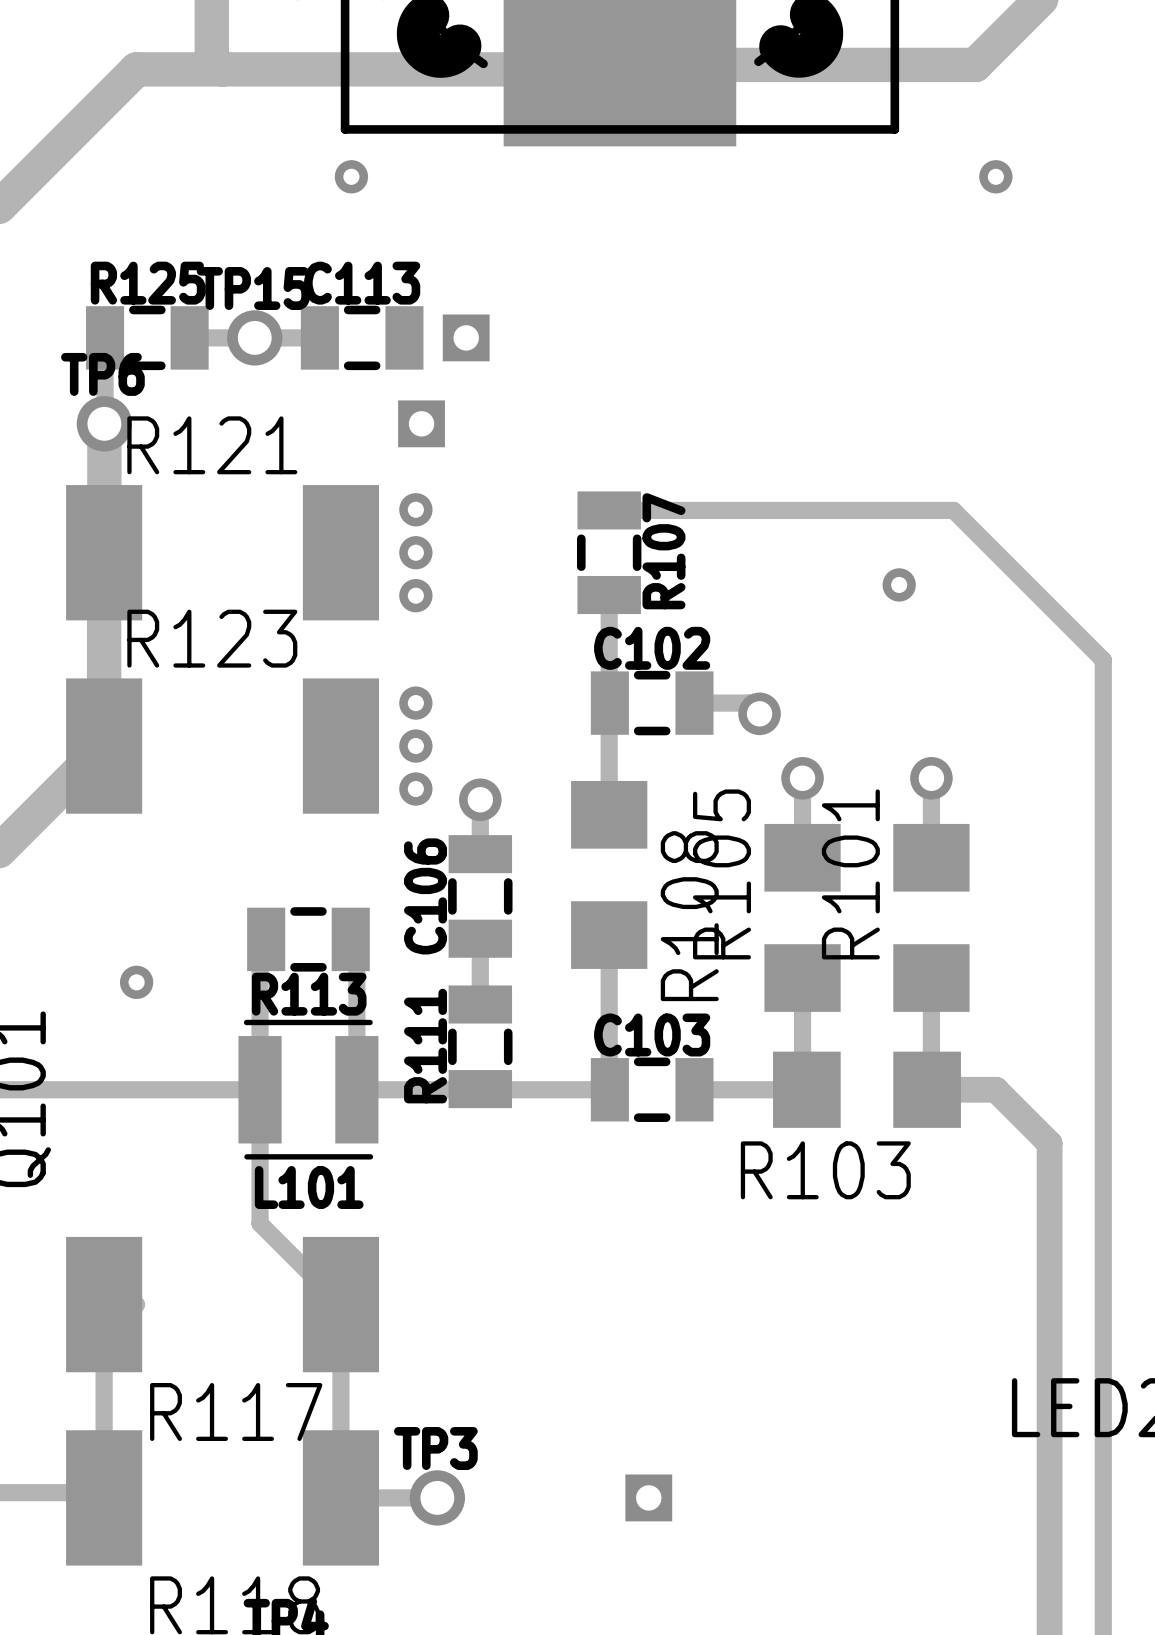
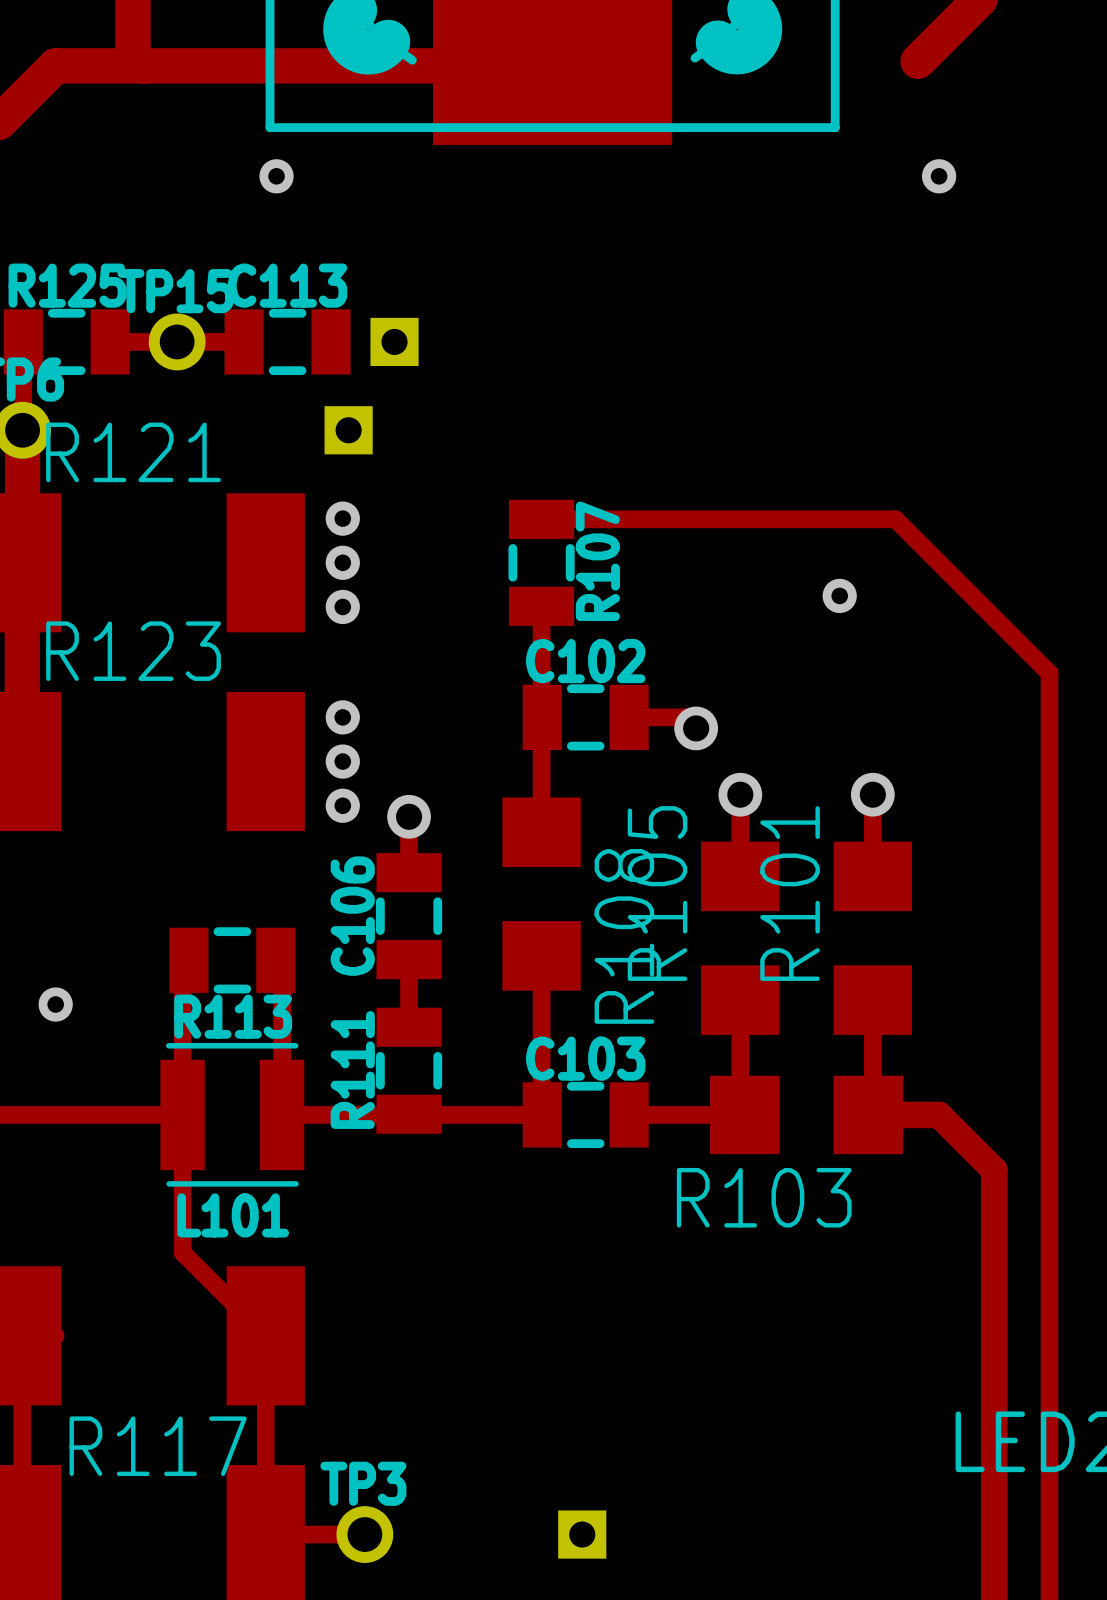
track: (975, 64) (619, 64) (615, 69) -> none

